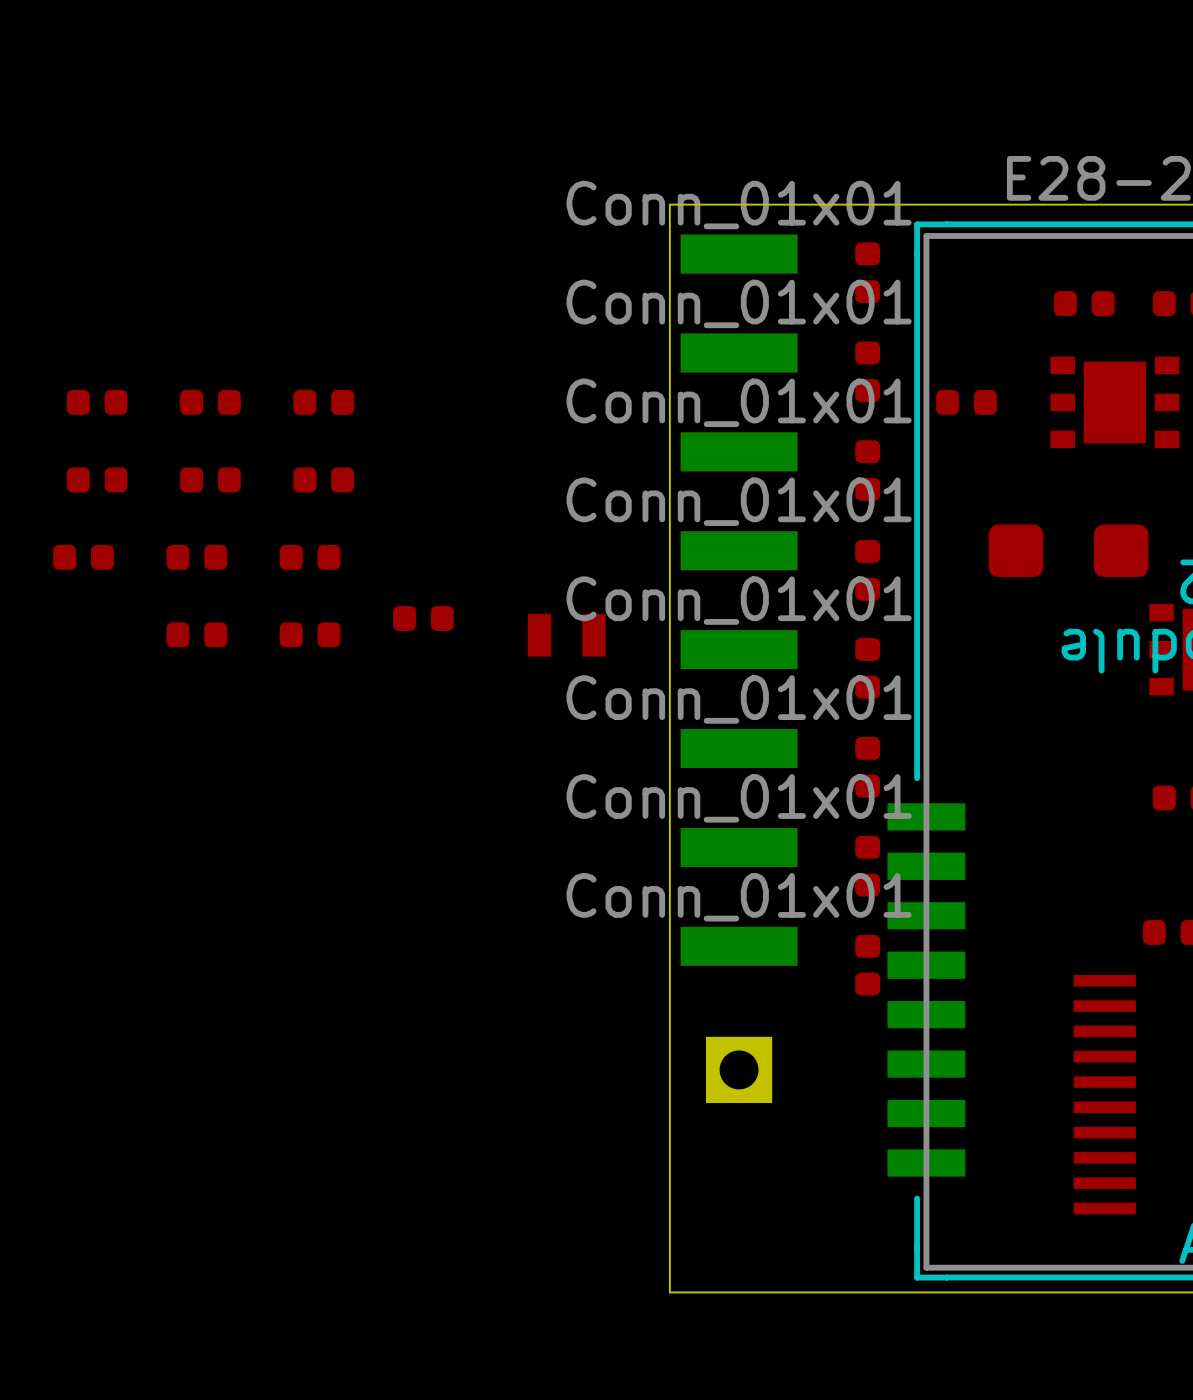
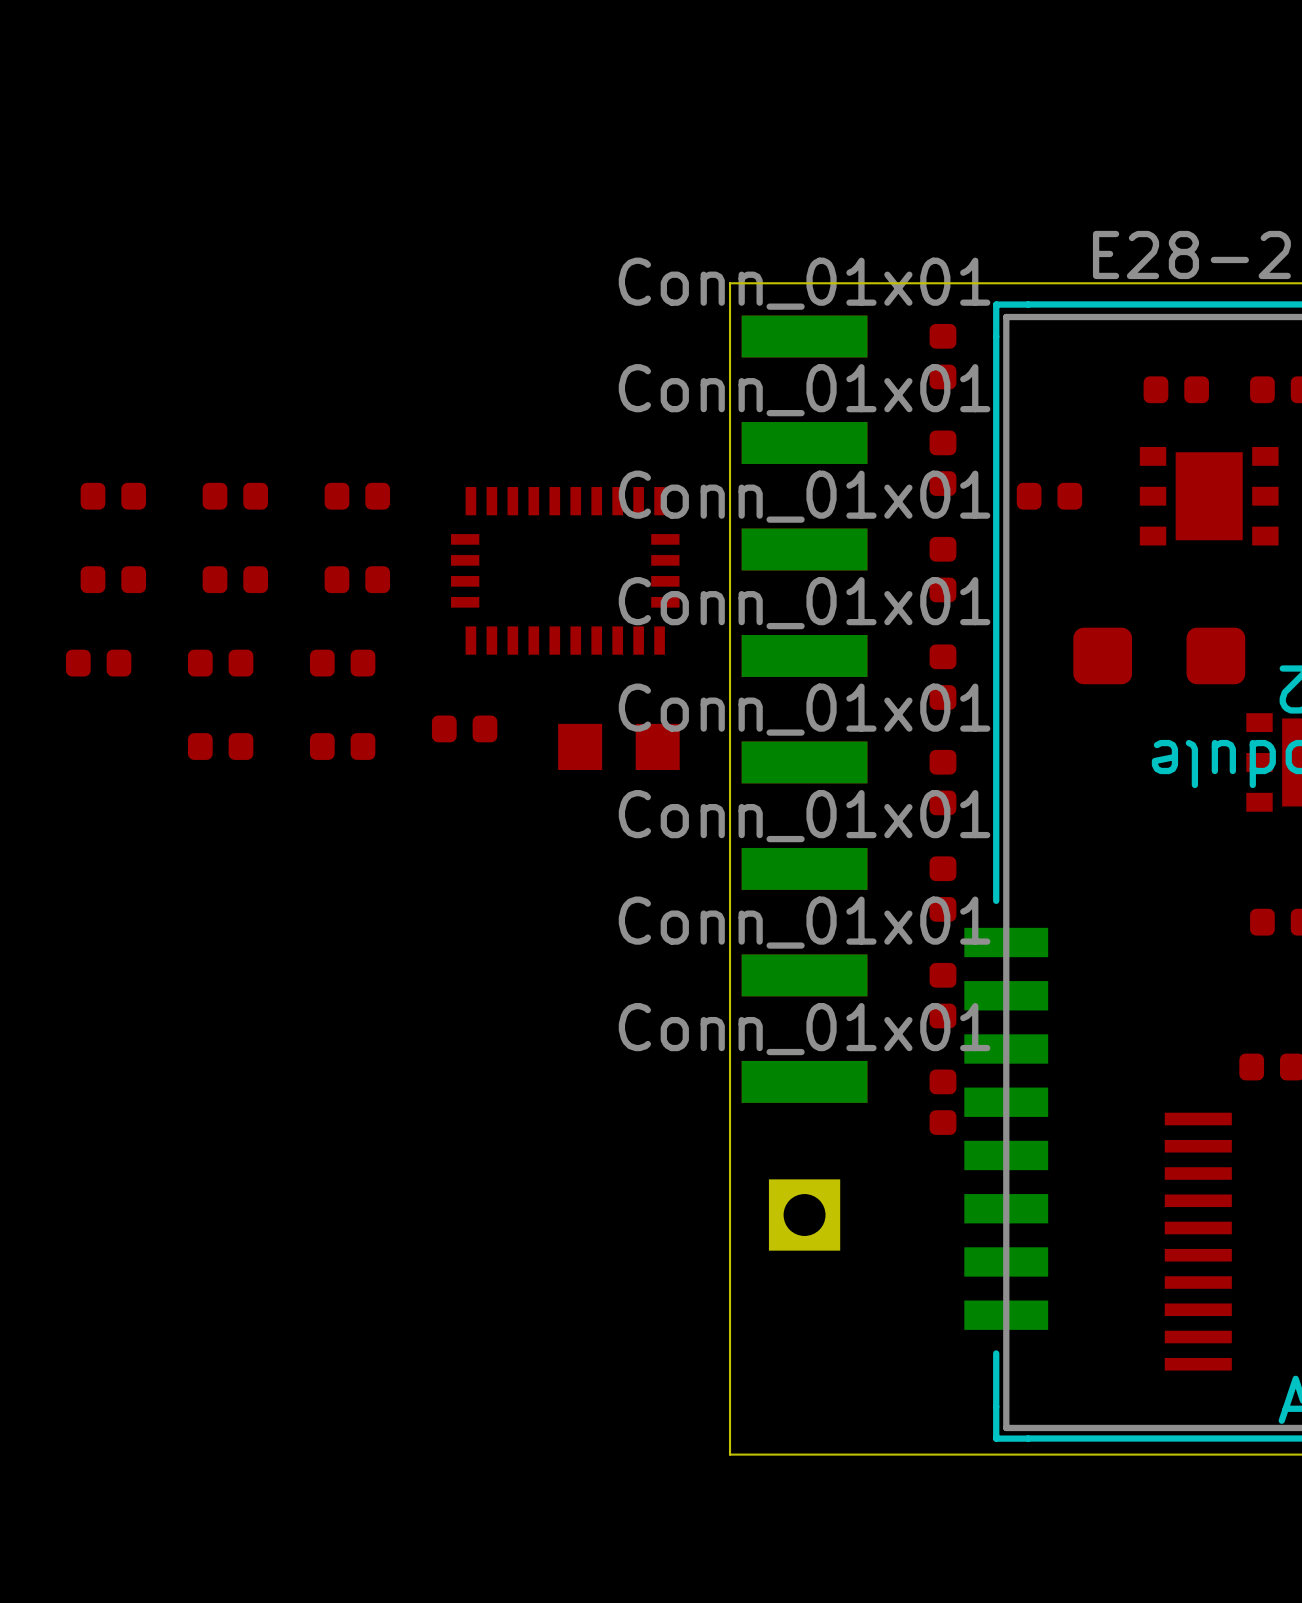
part: none -> (565, 570)
part footprint: [527, 613, 606, 657] -> [558, 723, 680, 770]

